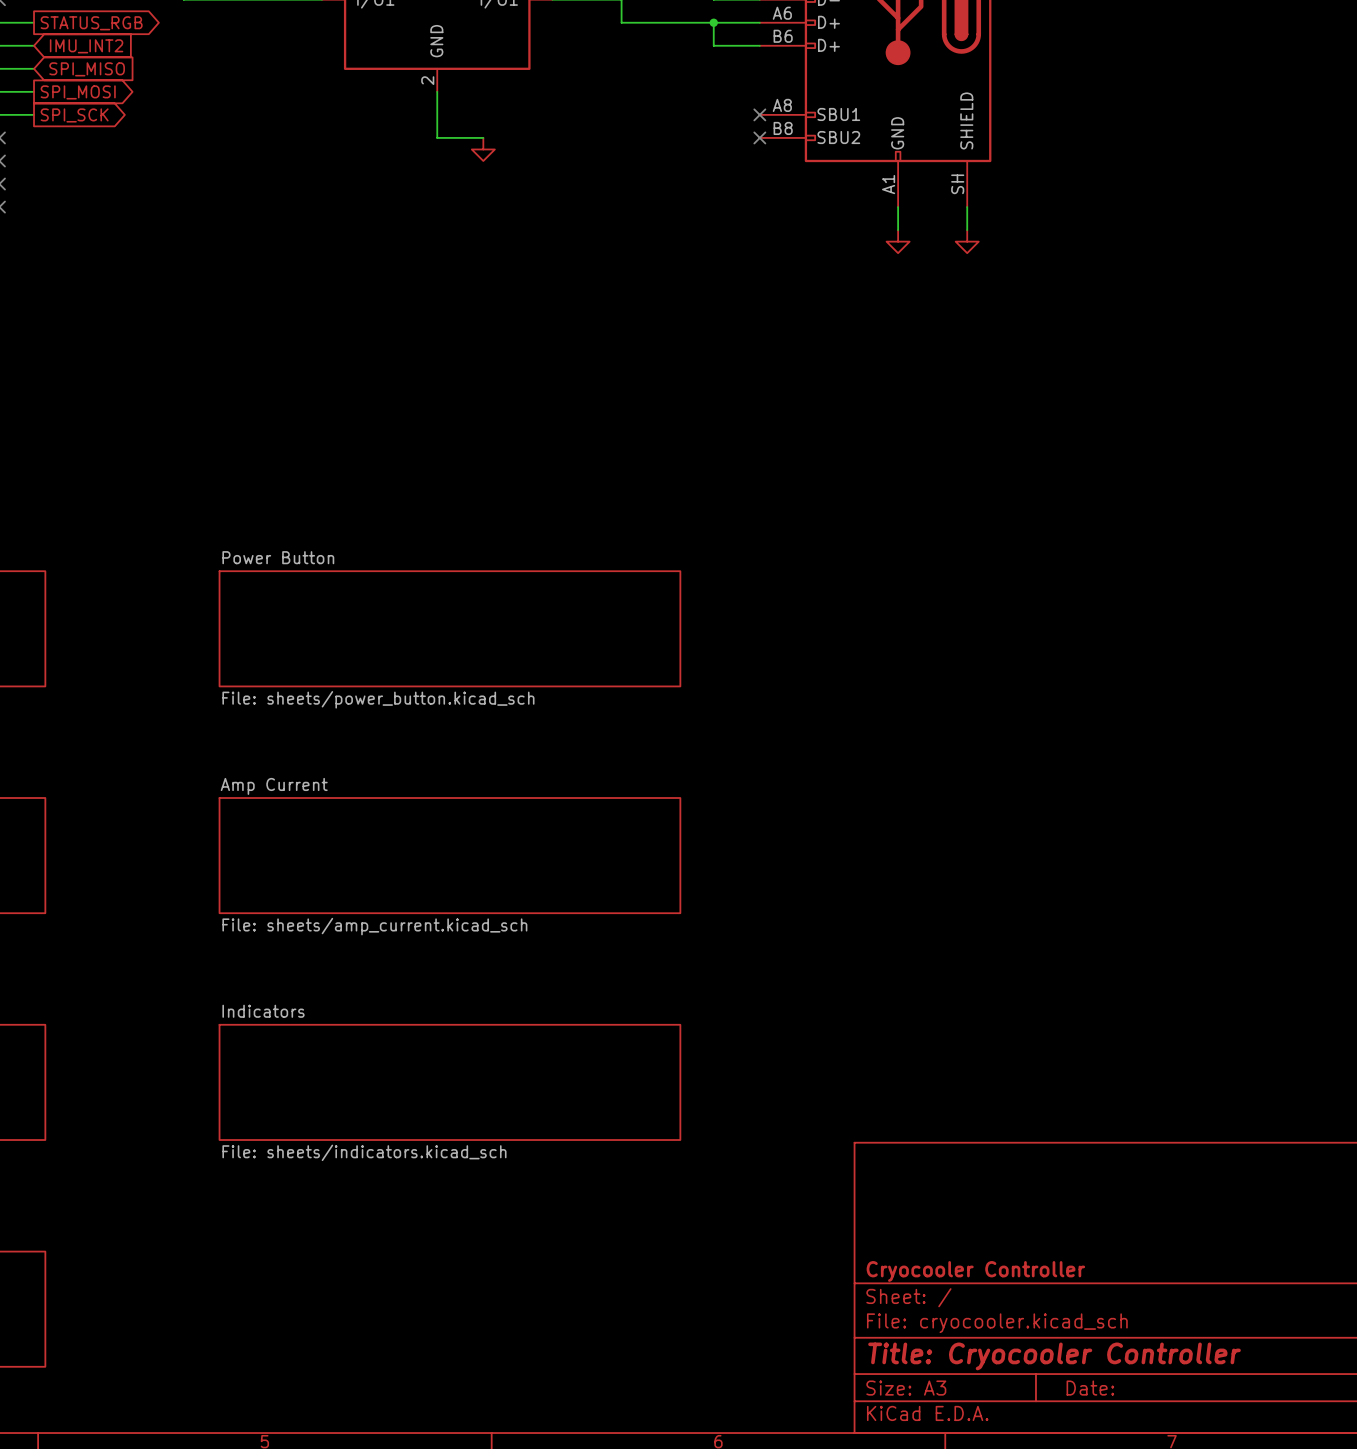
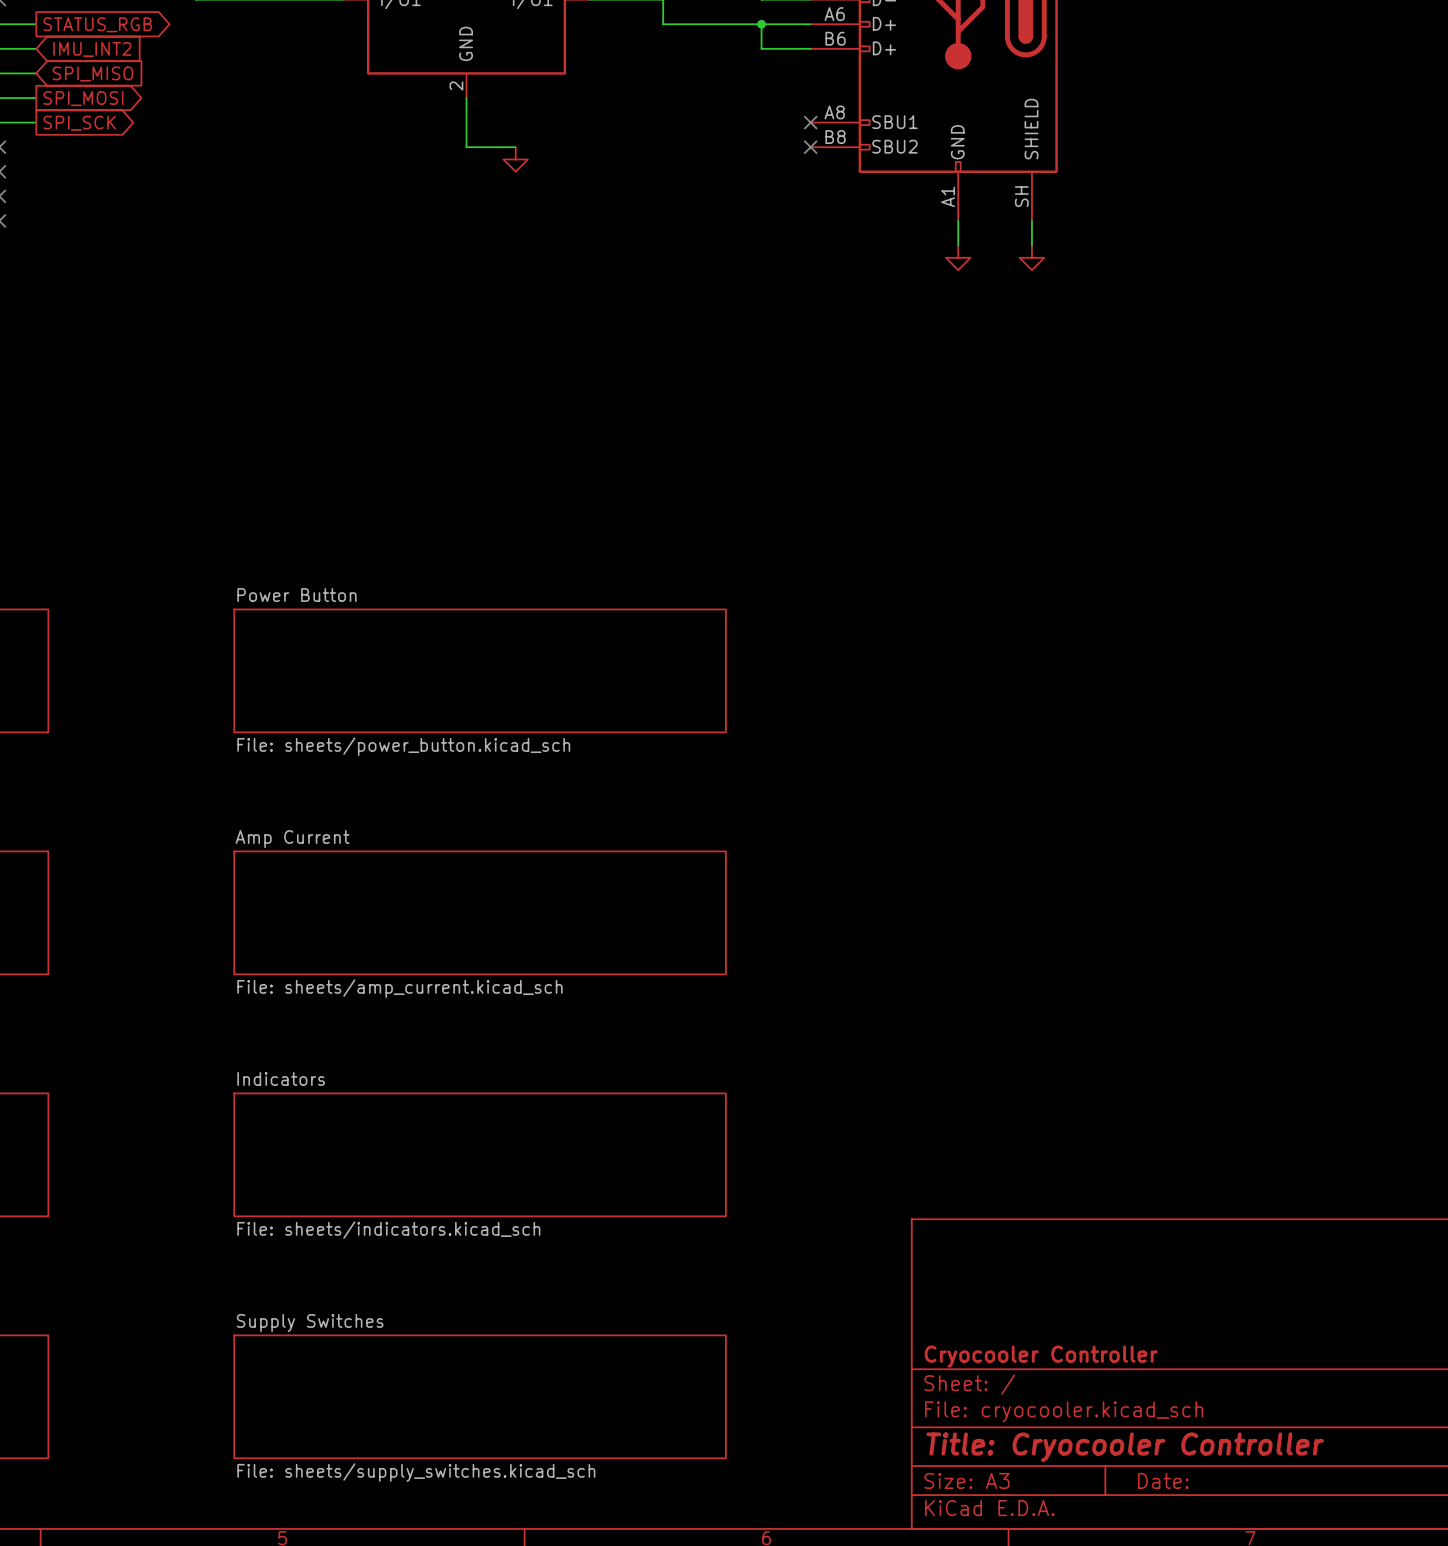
sheet Supply Switches: none -> File: sheets/supply_switches.kicad_sch (480, 1396)

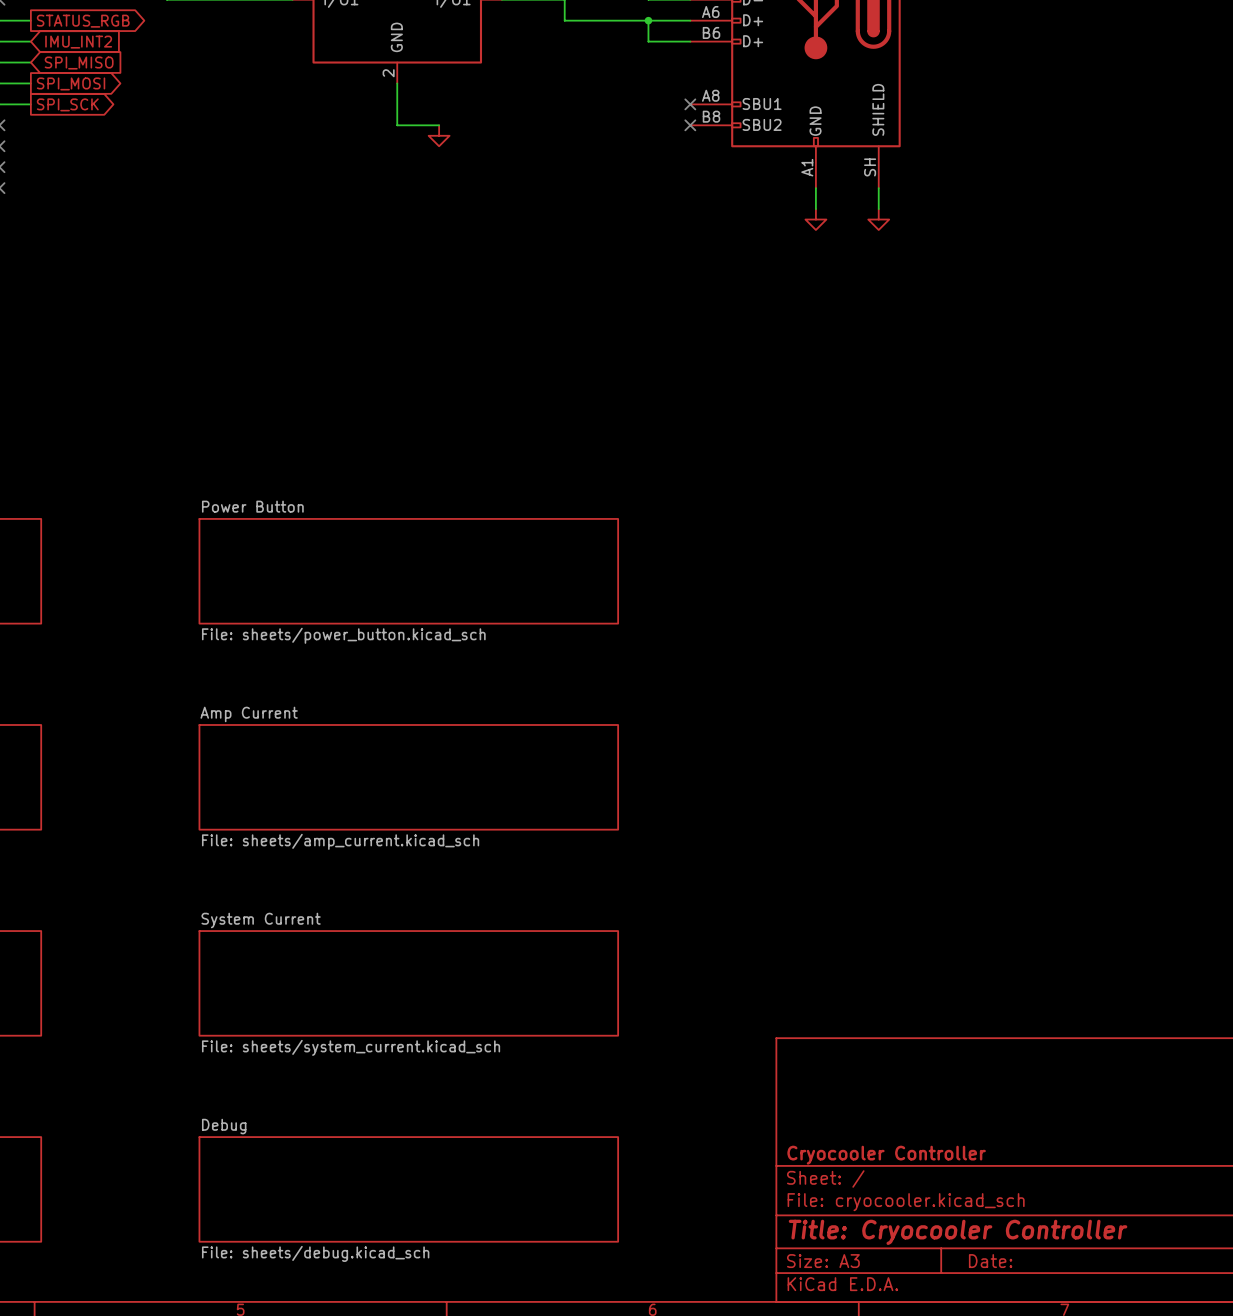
sheet Indicators name: Indicators (281, 1078) -> System Current (261, 920)
sheet Indicators value: File: sheets/indicators.kicad_sch (388, 1230) -> File: sheets/system_current.kicad_sch (351, 1047)
sheet Supply Switches name: Supply Switches (310, 1322) -> Debug (224, 1126)
sheet Supply Switches value: File: sheets/supply_switches.kicad_sch (416, 1472) -> File: sheets/debug.kicad_sch (315, 1253)

